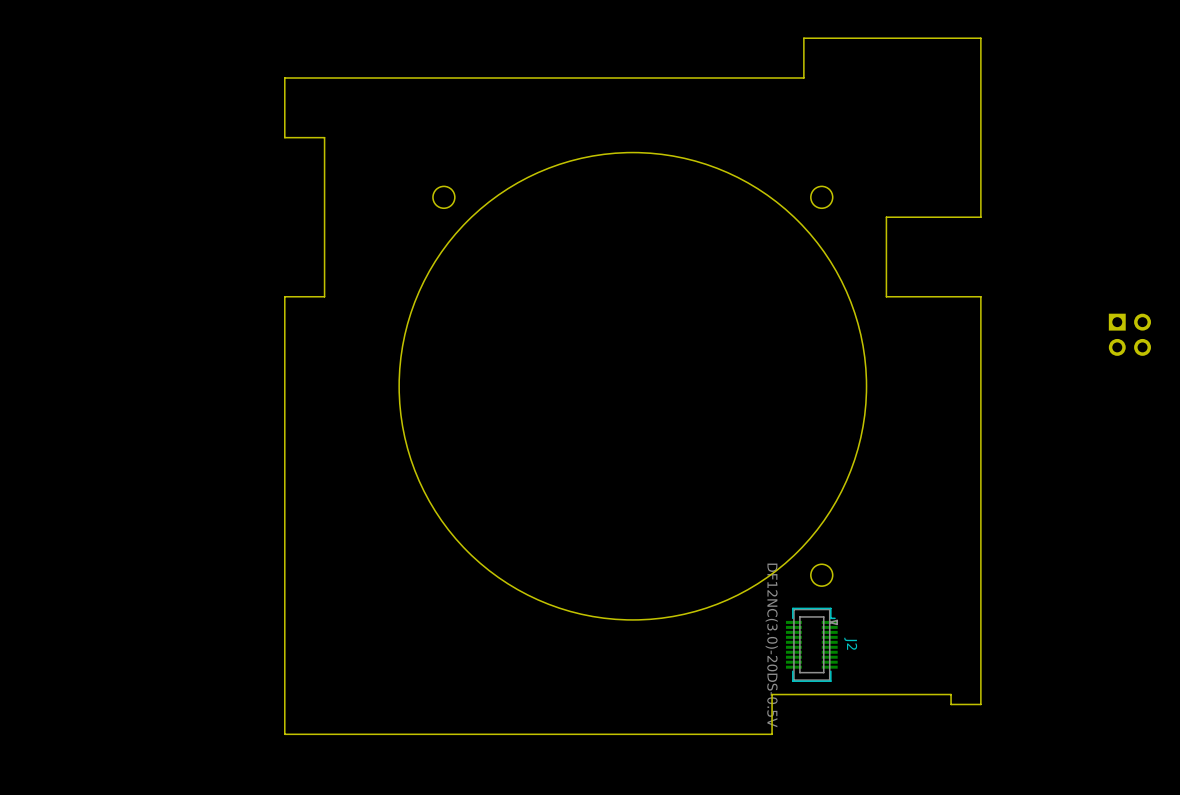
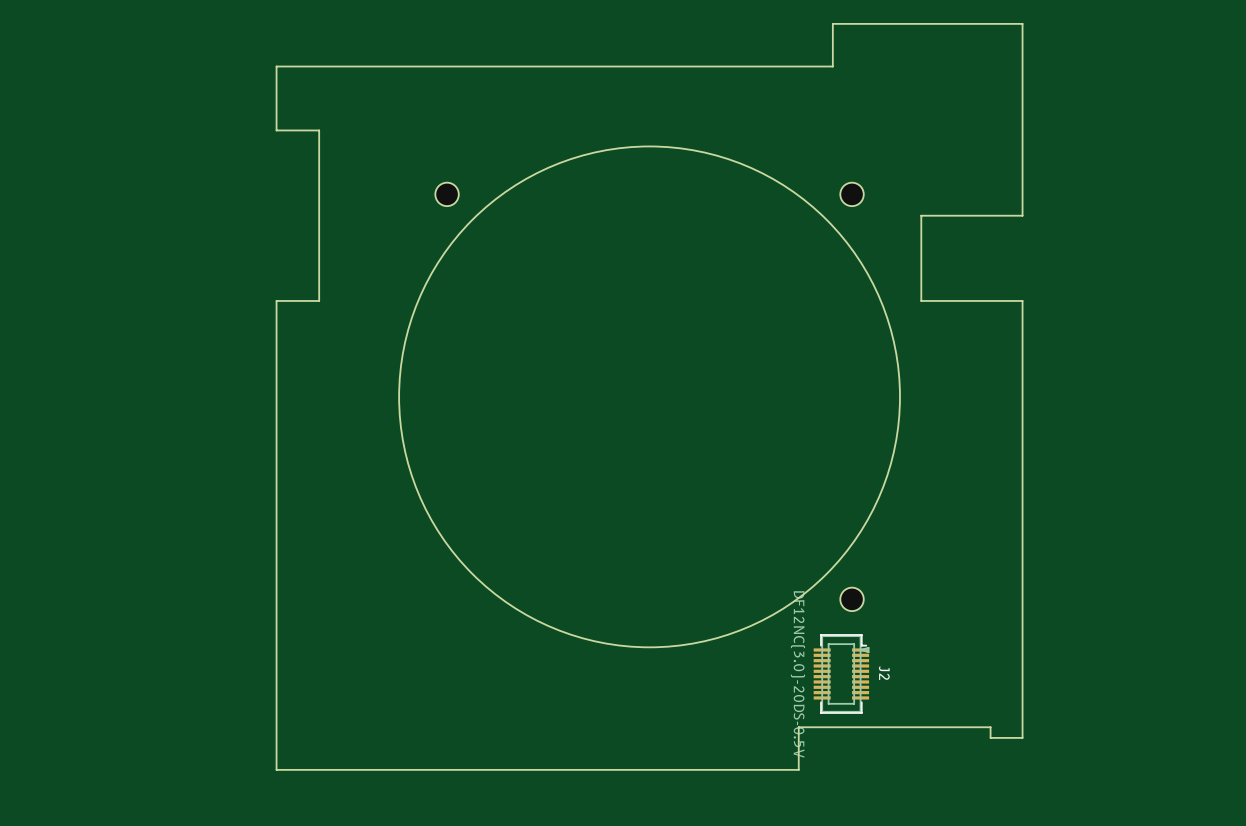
part: (1129, 334) -> none

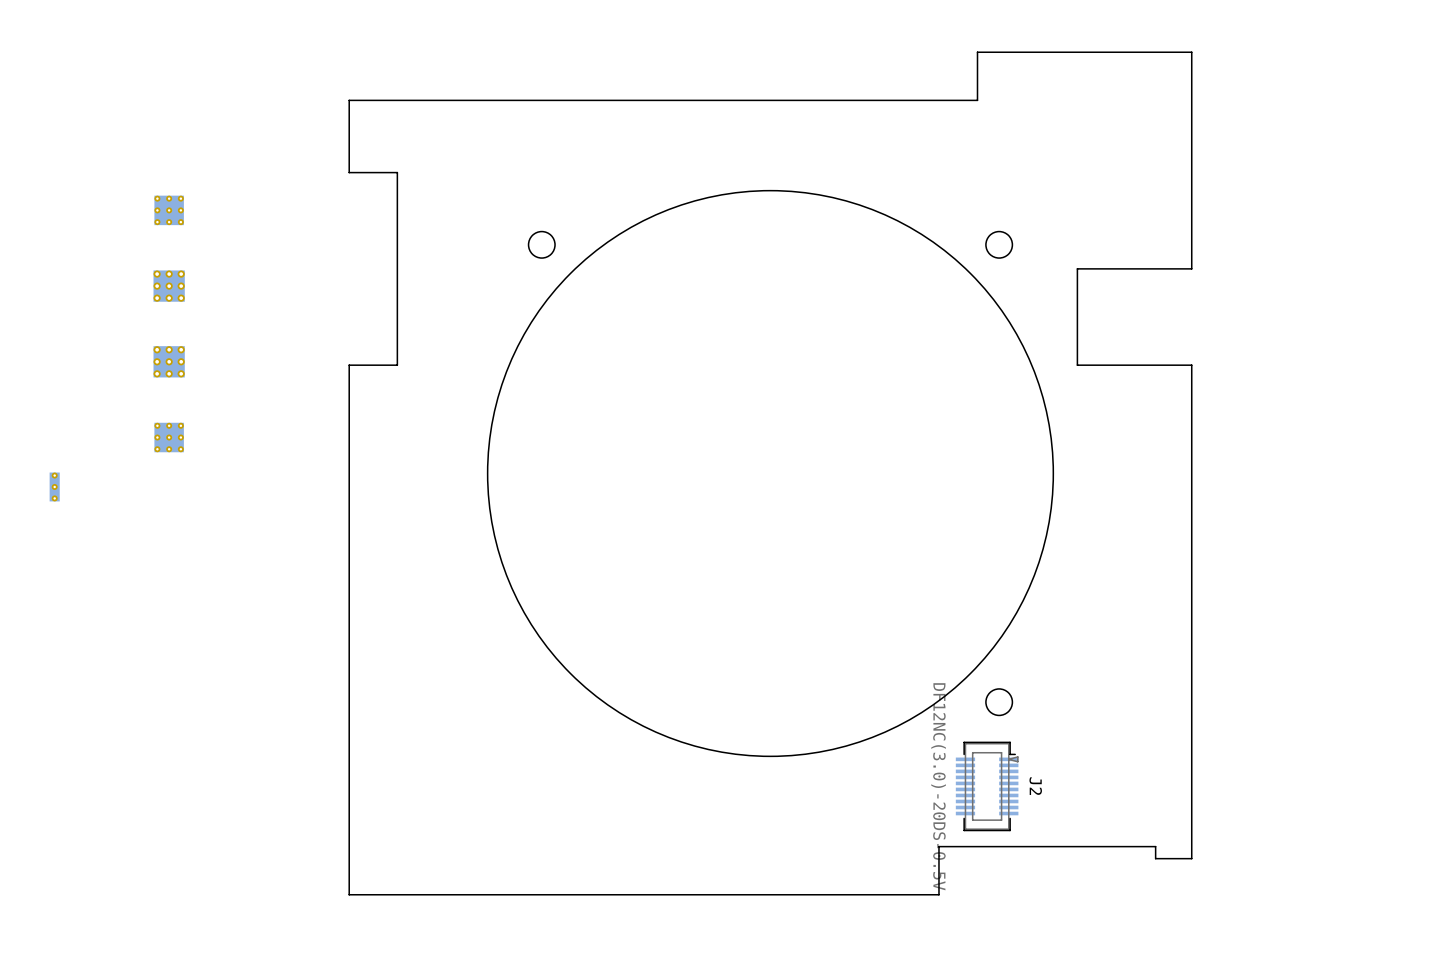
part: none -> (169, 210)
part: none -> (169, 286)
part: none -> (169, 361)
part: none -> (169, 437)
part: none -> (54, 486)

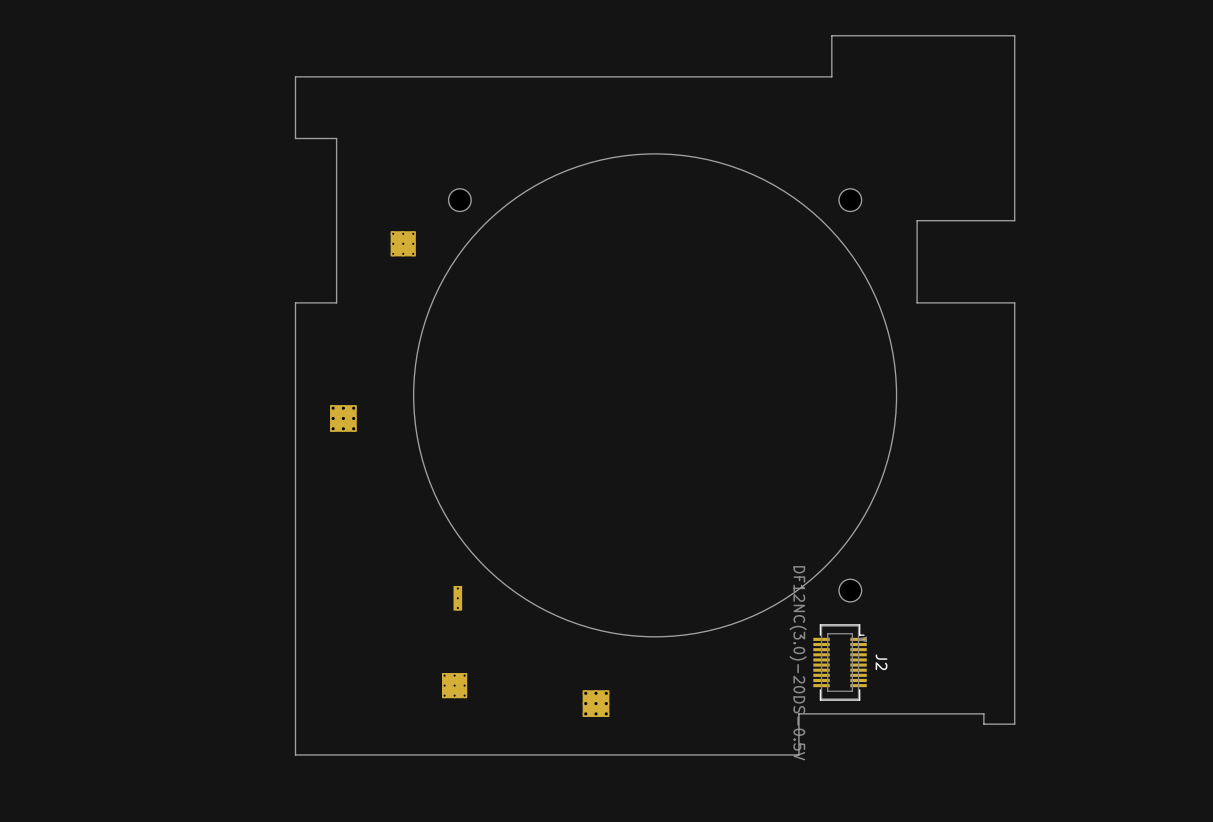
part: (169, 210) -> none
part: (169, 286) -> none
part: none -> (403, 243)
part: (169, 361) -> none
part: (169, 437) -> none
part: (54, 486) -> none
part: none -> (343, 418)
part: none -> (457, 598)
part: none -> (454, 685)
part: none -> (596, 703)

